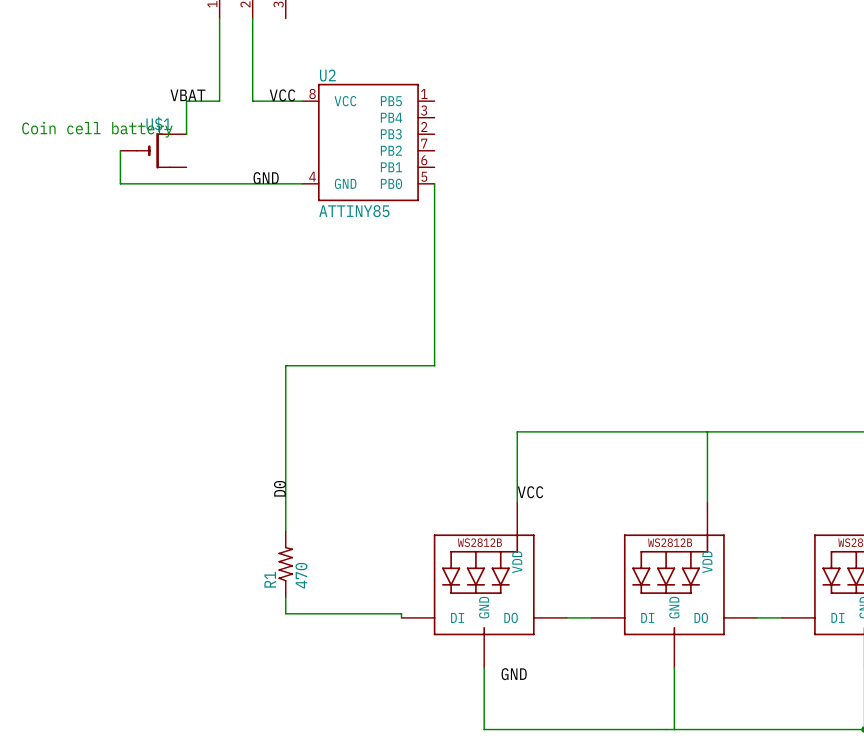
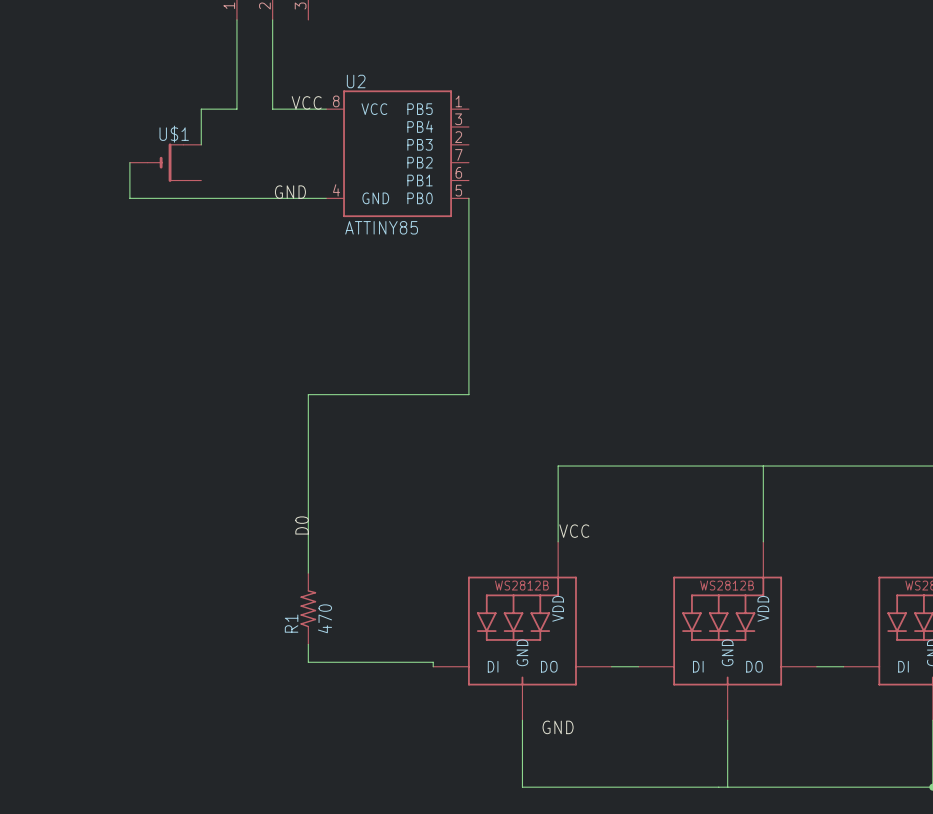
label: VBAT (187, 95) -> none
text: Coin cell battery (97, 129) -> none

